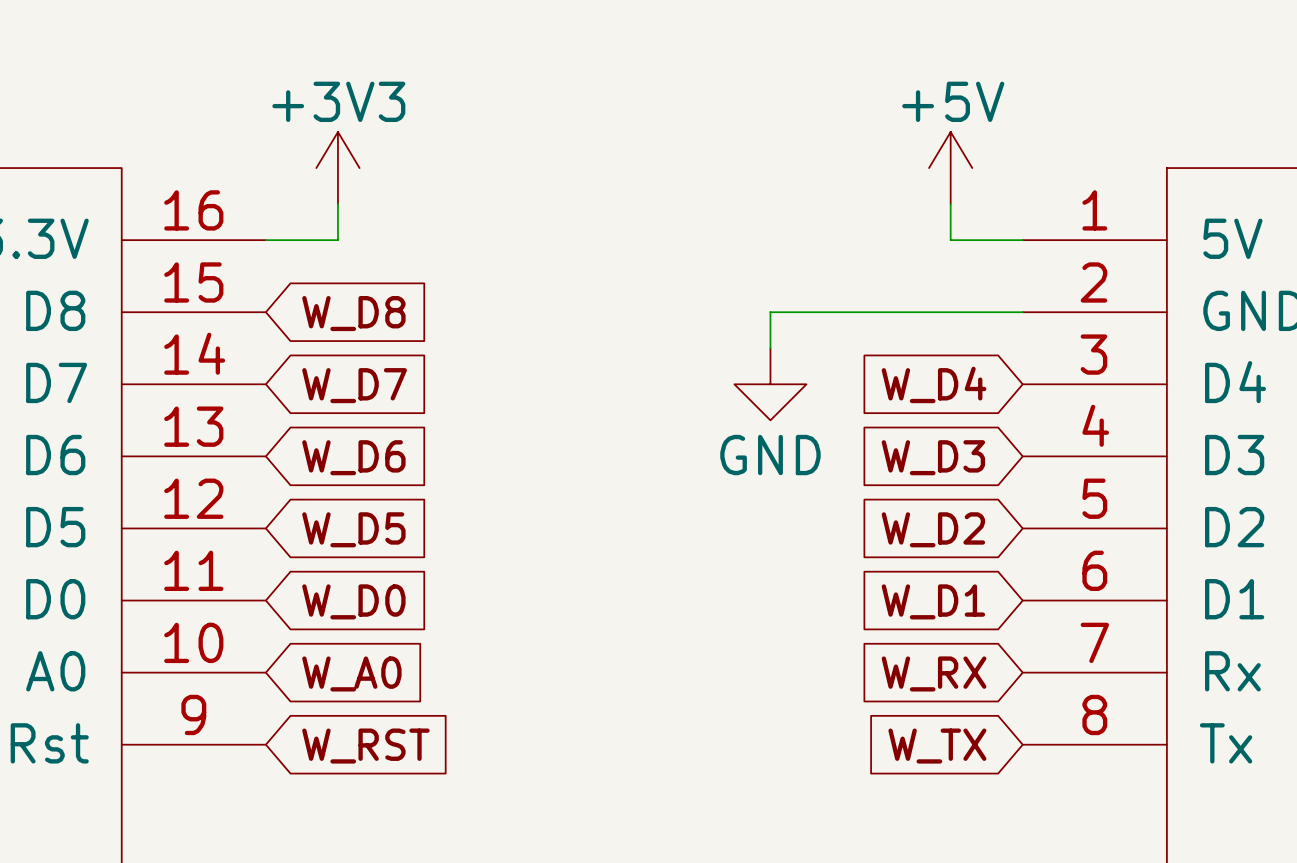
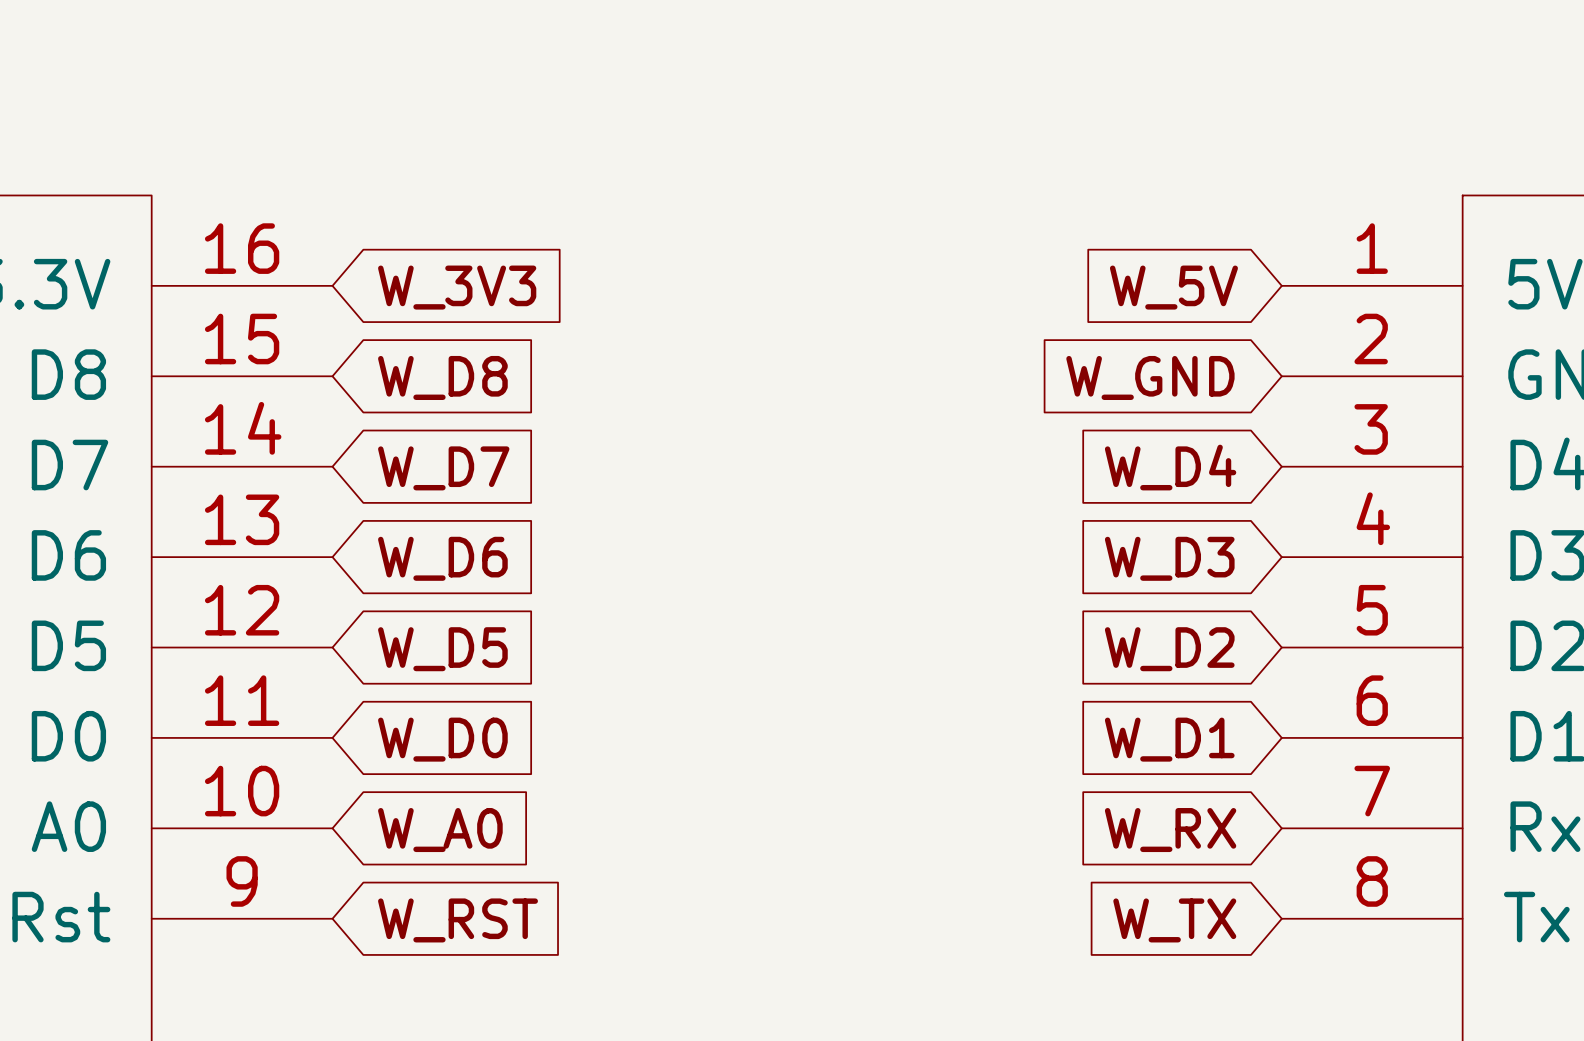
power symbol: +3V3 (337, 168) -> none
power symbol: +5V (950, 168) -> none
wire: (337, 204) (337, 240) (265, 240) -> none
wire: (950, 204) (950, 240) (1022, 240) -> none
global label: none -> W_3V3 (457, 287)
global label: none -> W_5V (1173, 287)
wire: (1022, 312) (770, 312) (770, 348) -> none
global label: none -> W_GND (1150, 377)
power symbol: GND (770, 384) -> none

